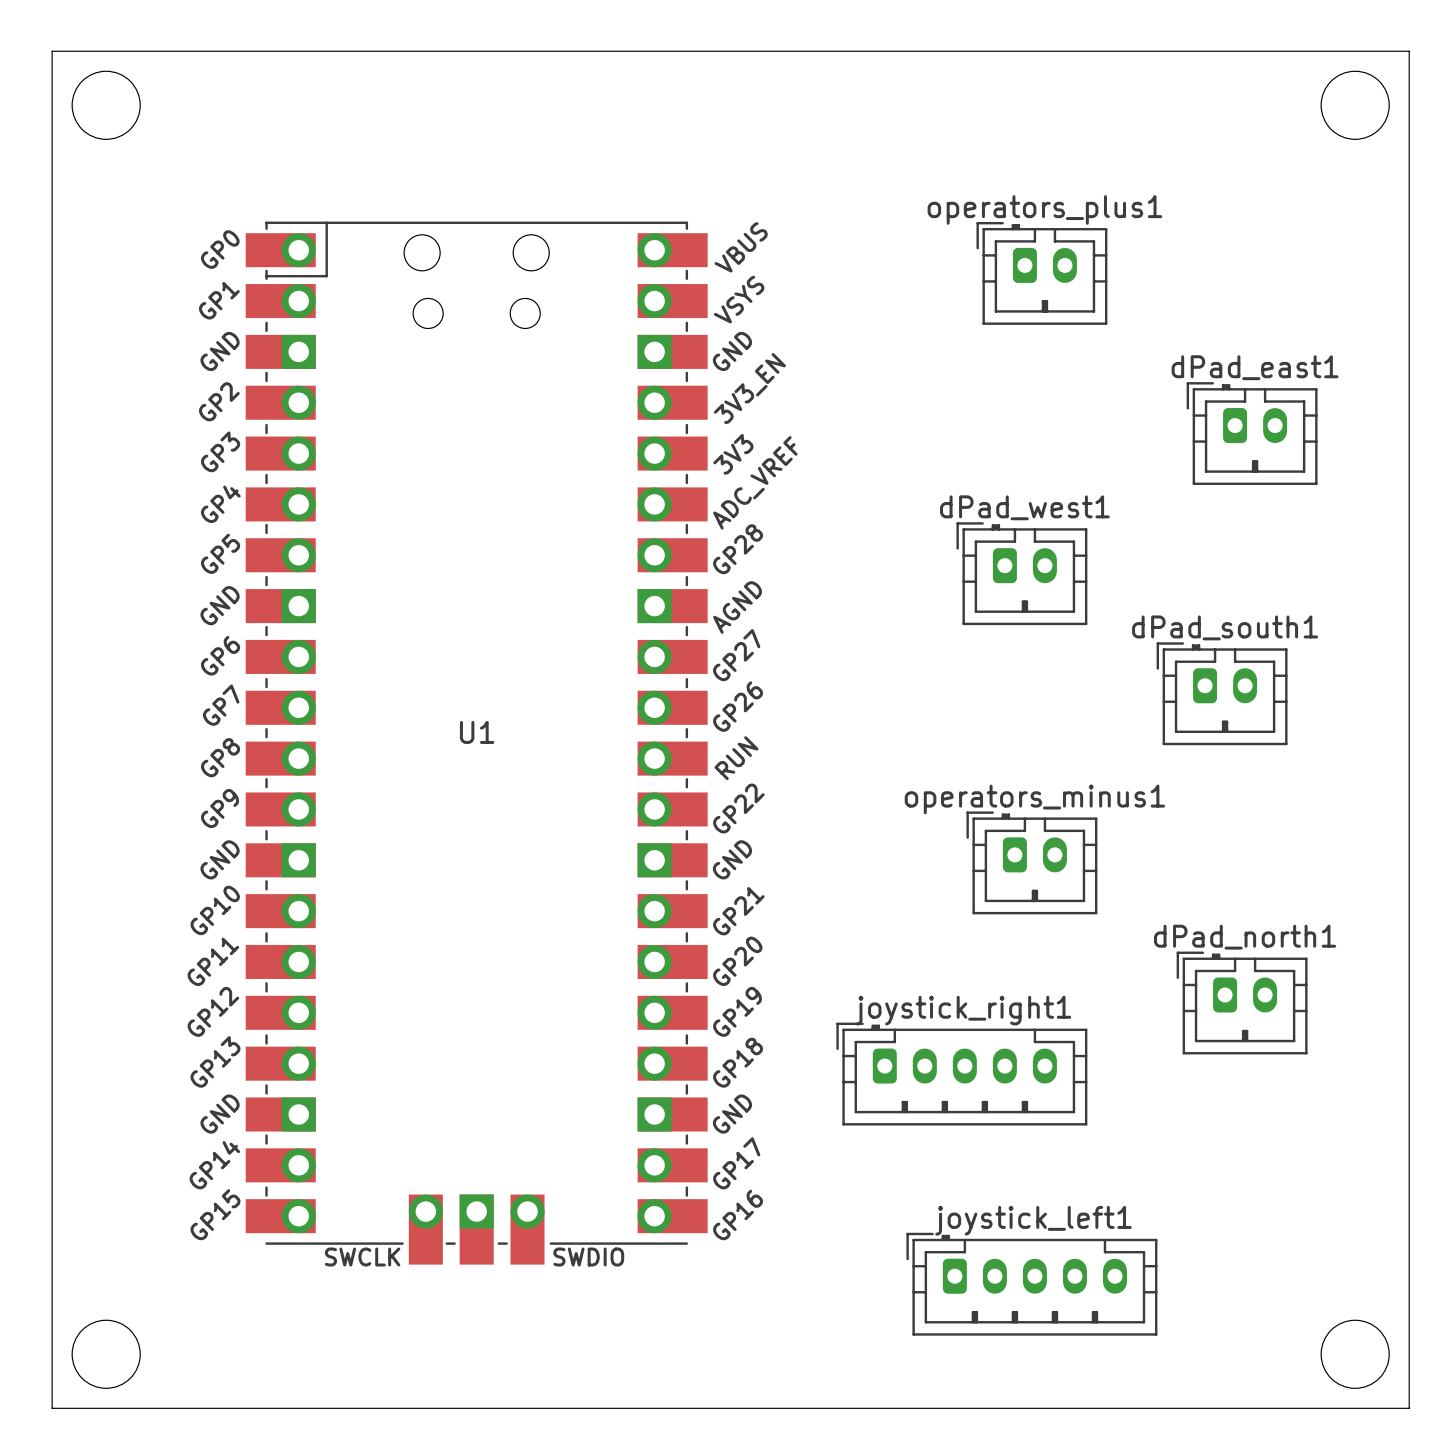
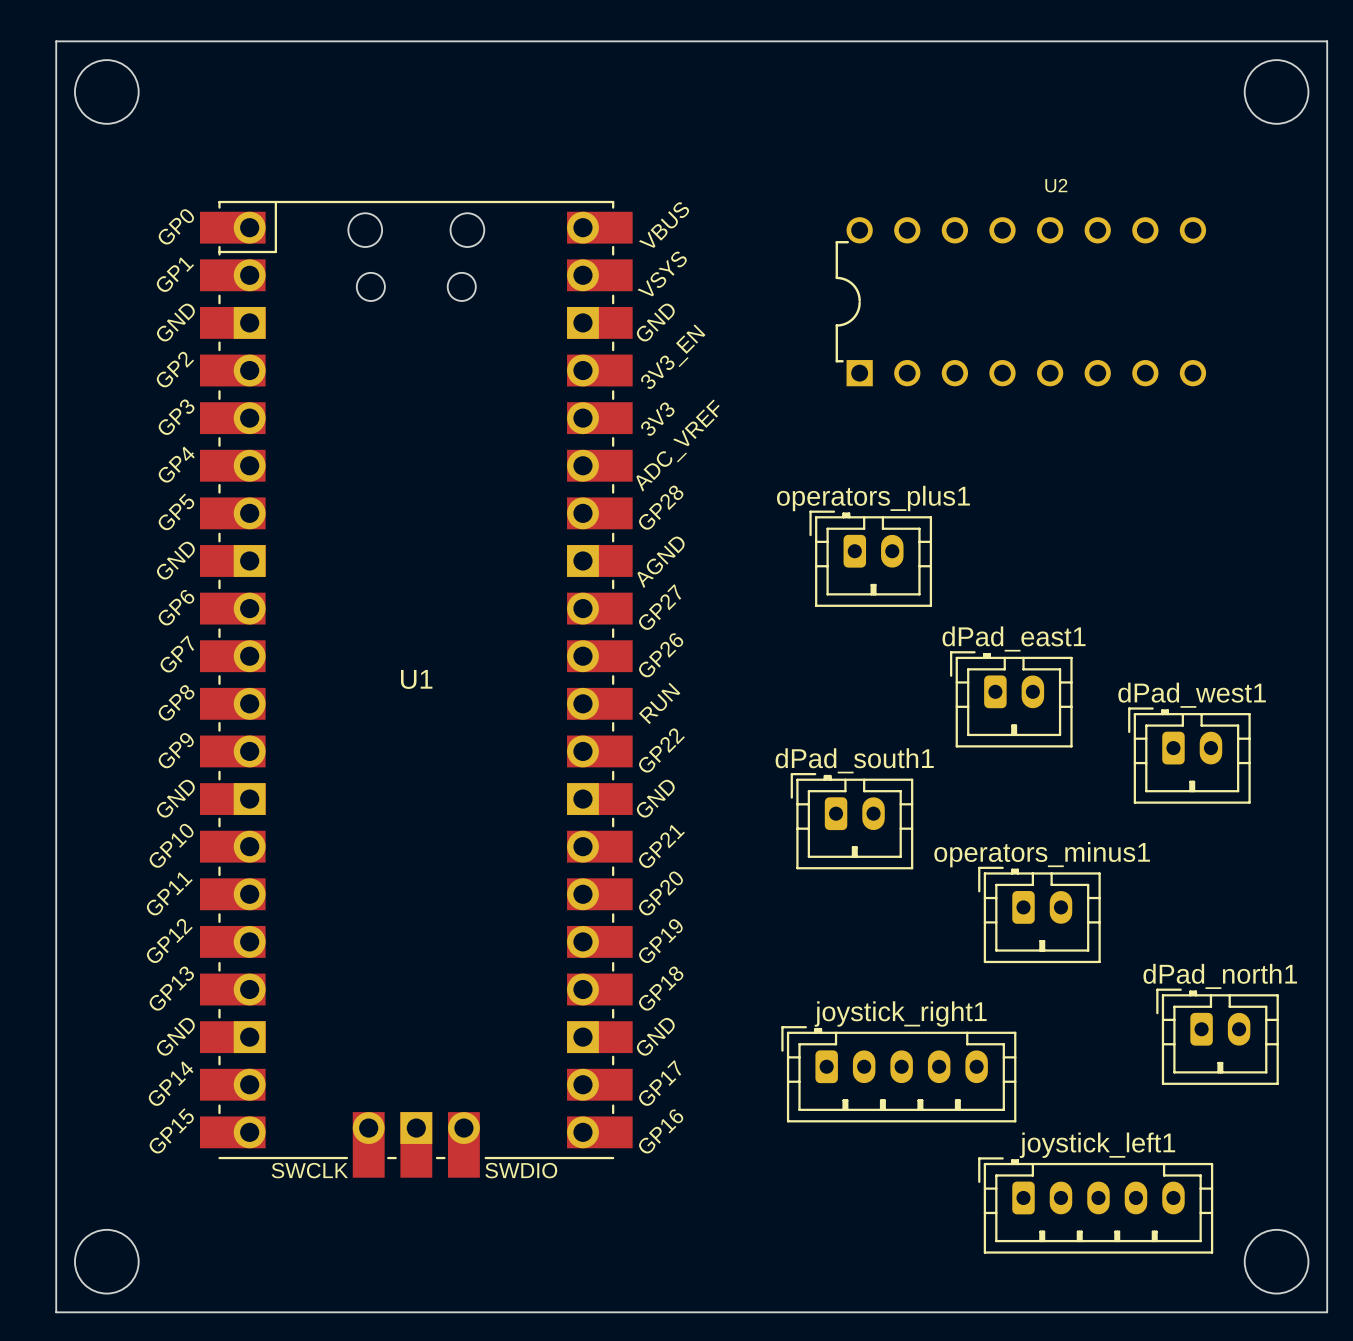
operators_plus1 position: (1041, 273) -> (870, 558)
U2: none -> (1020, 301)
dPad_east1 position: (1252, 433) -> (1011, 699)
dPad_west1 position: (1021, 573) -> (1189, 755)
dPad_south1 position: (1222, 693) -> (851, 821)
U1 position: (476, 743) -> (416, 689)
operators_minus1 position: (1031, 862) -> (1039, 914)
dPad_north1 position: (1242, 1003) -> (1217, 1036)
joystick_right1 position: (961, 1074) -> (898, 1074)
joystick_left1 position: (1031, 1284) -> (1095, 1205)

